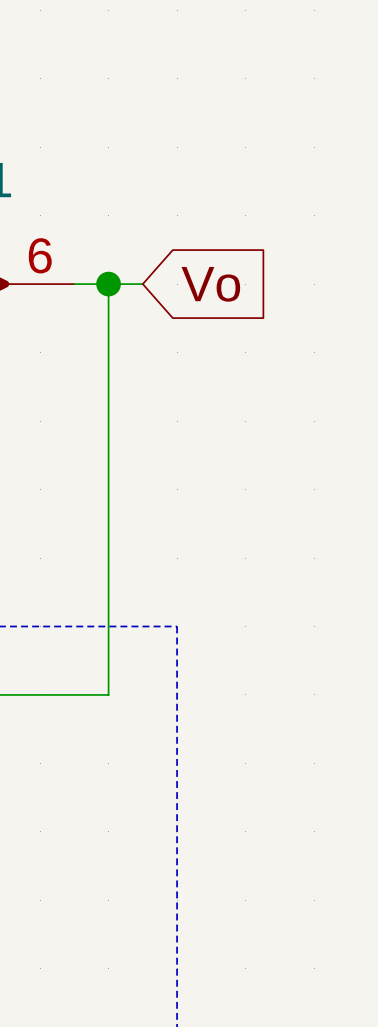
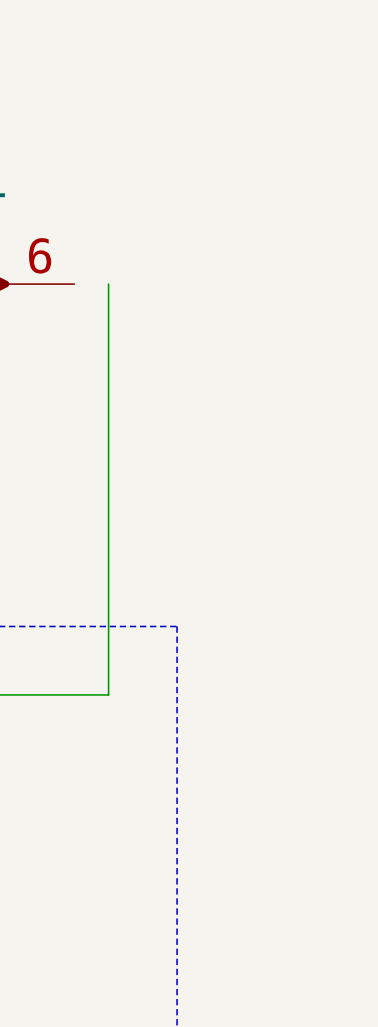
wire: (74, 284) (142, 284) -> none
junction: (108, 284) -> none
global label: Vo (210, 284) -> none

